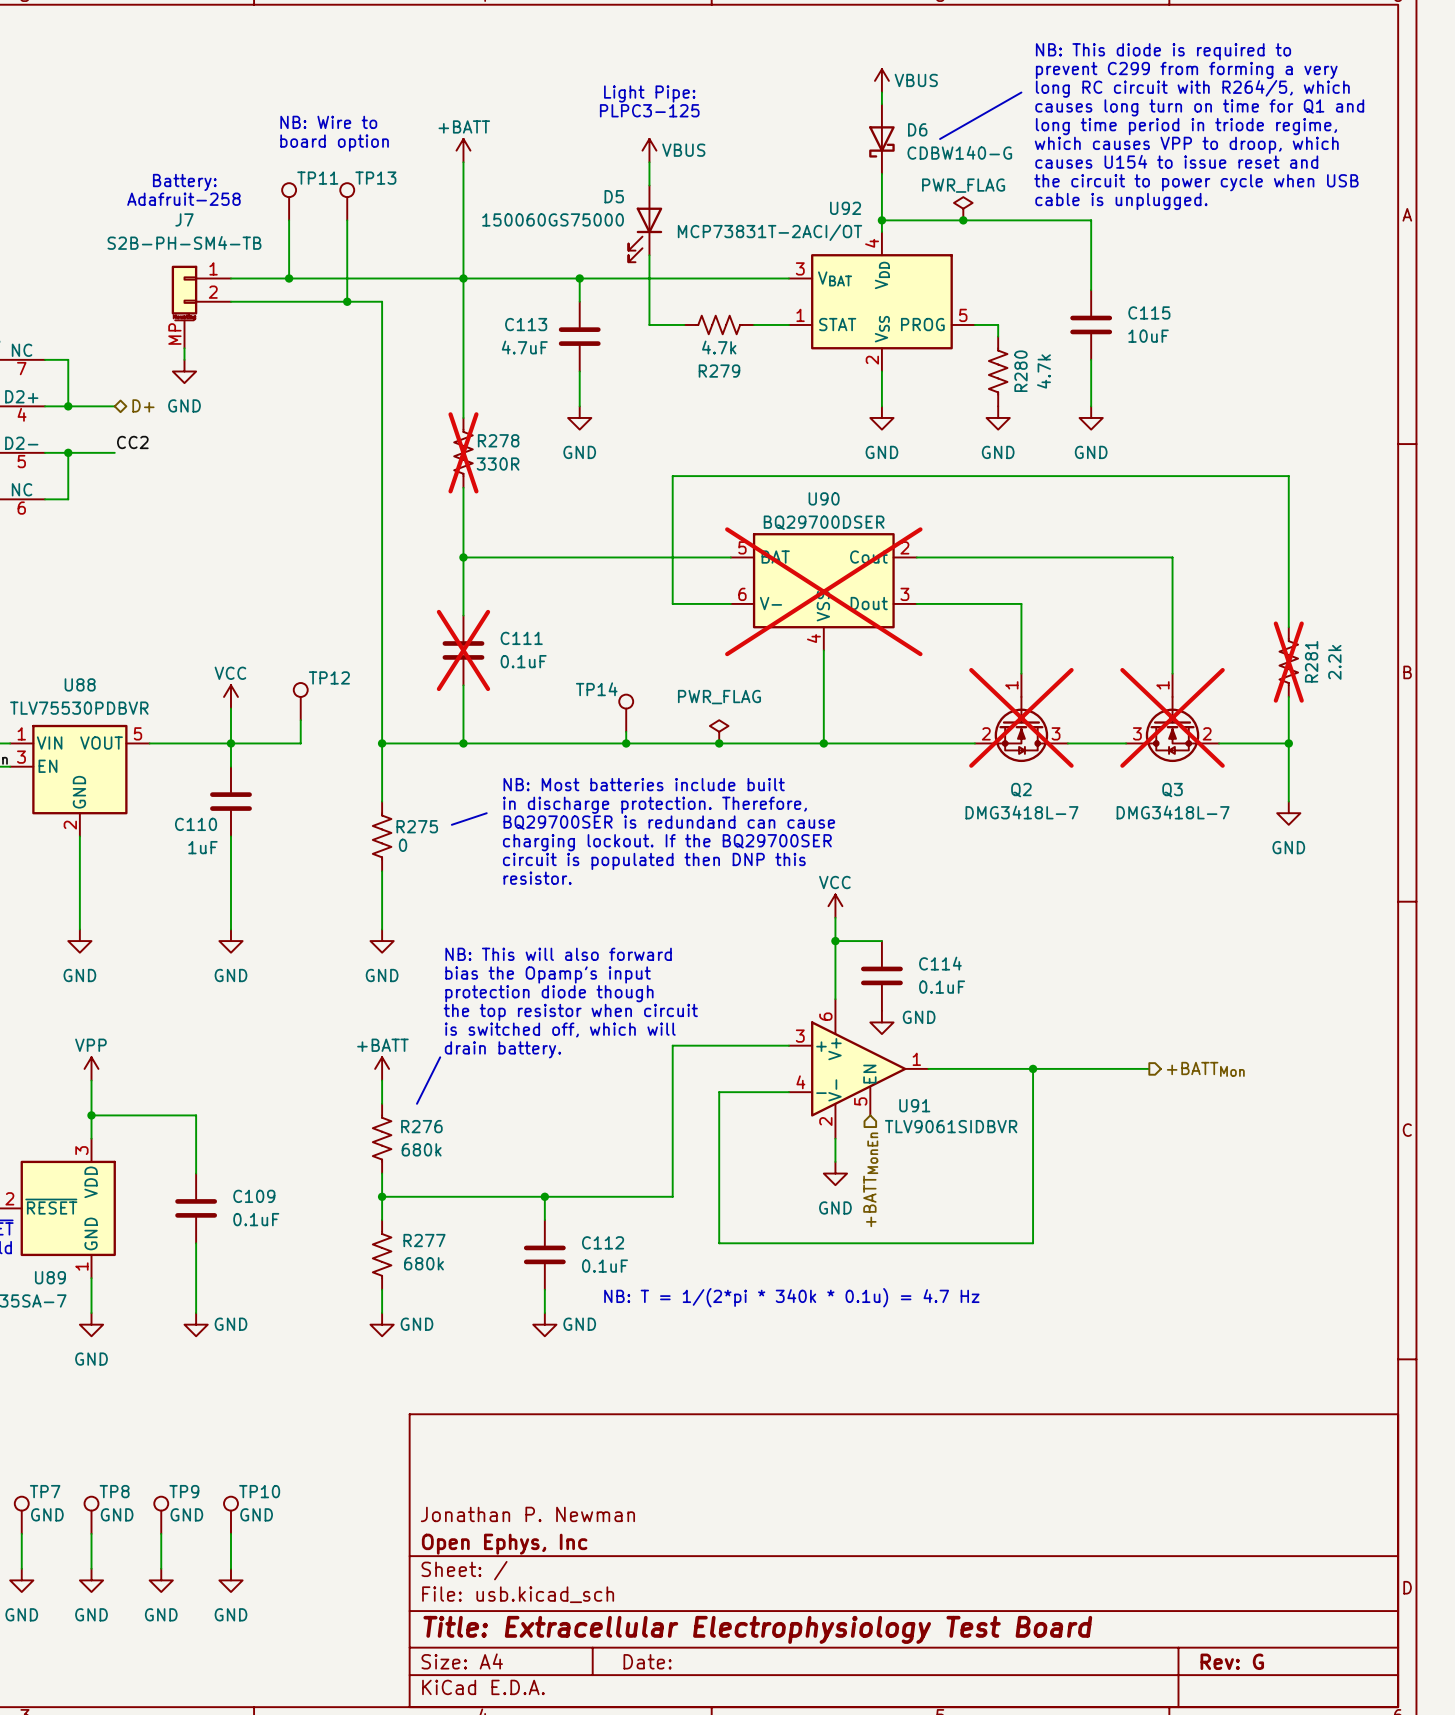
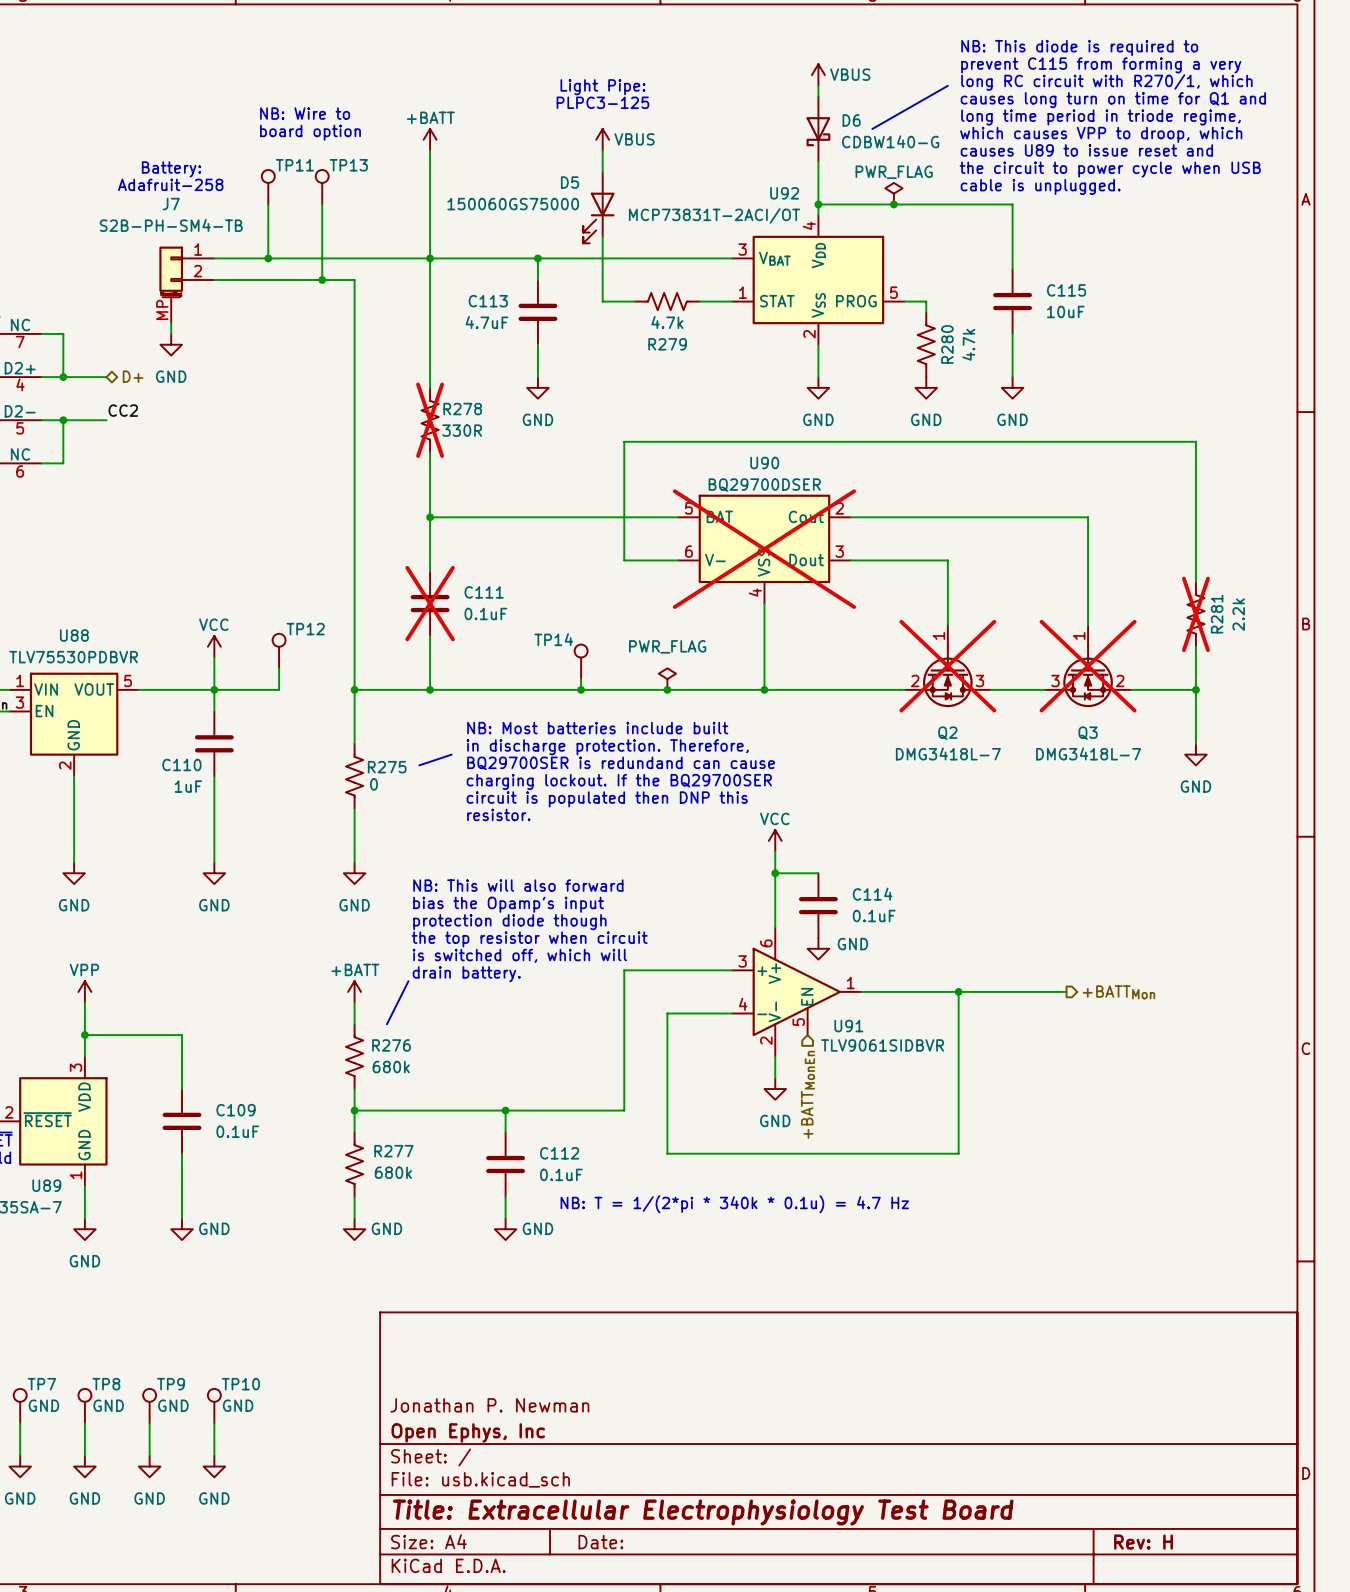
text: prevent C299 from forming a very (1186, 70) -> prevent C115 from forming a very (1101, 65)
text: long RC circuit with R264/5, which (1192, 88) -> long RC circuit with R270/1, which (1106, 82)
text: causes U154 to issue reset and (1176, 161) -> causes U89 to issue reset and (1086, 150)
title block: Rev: G (1232, 1661) -> Rev: H (1143, 1542)

